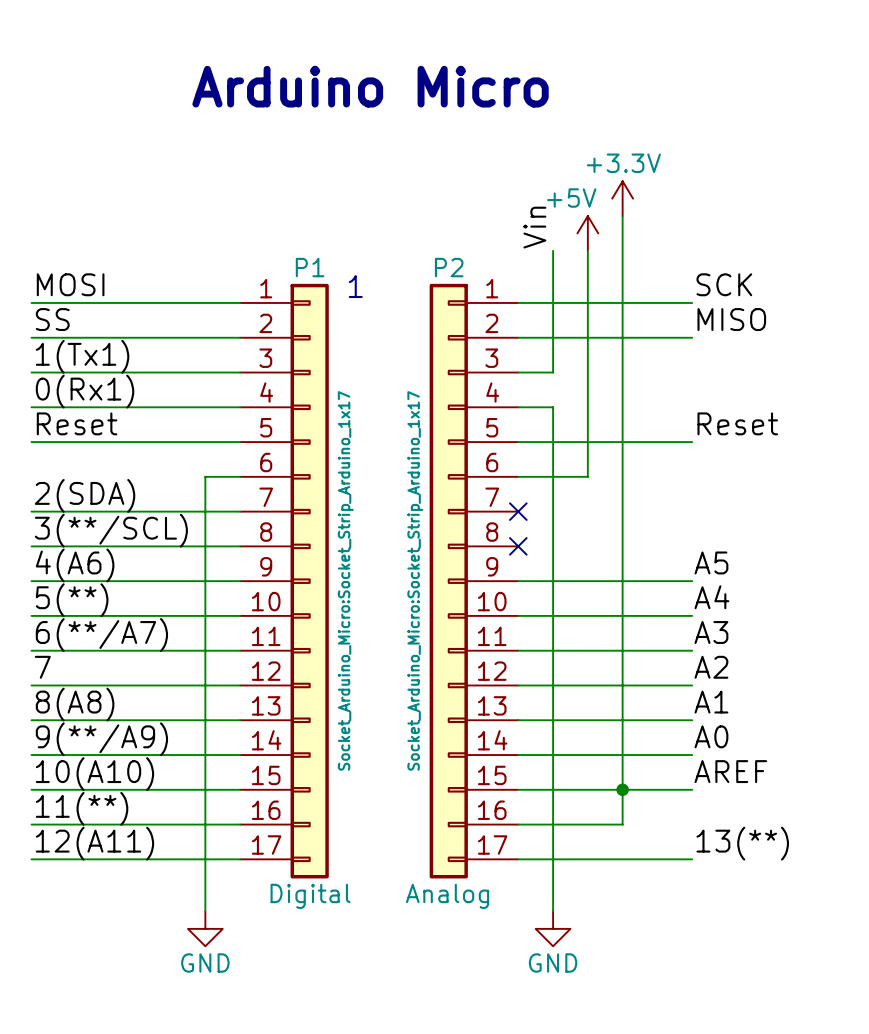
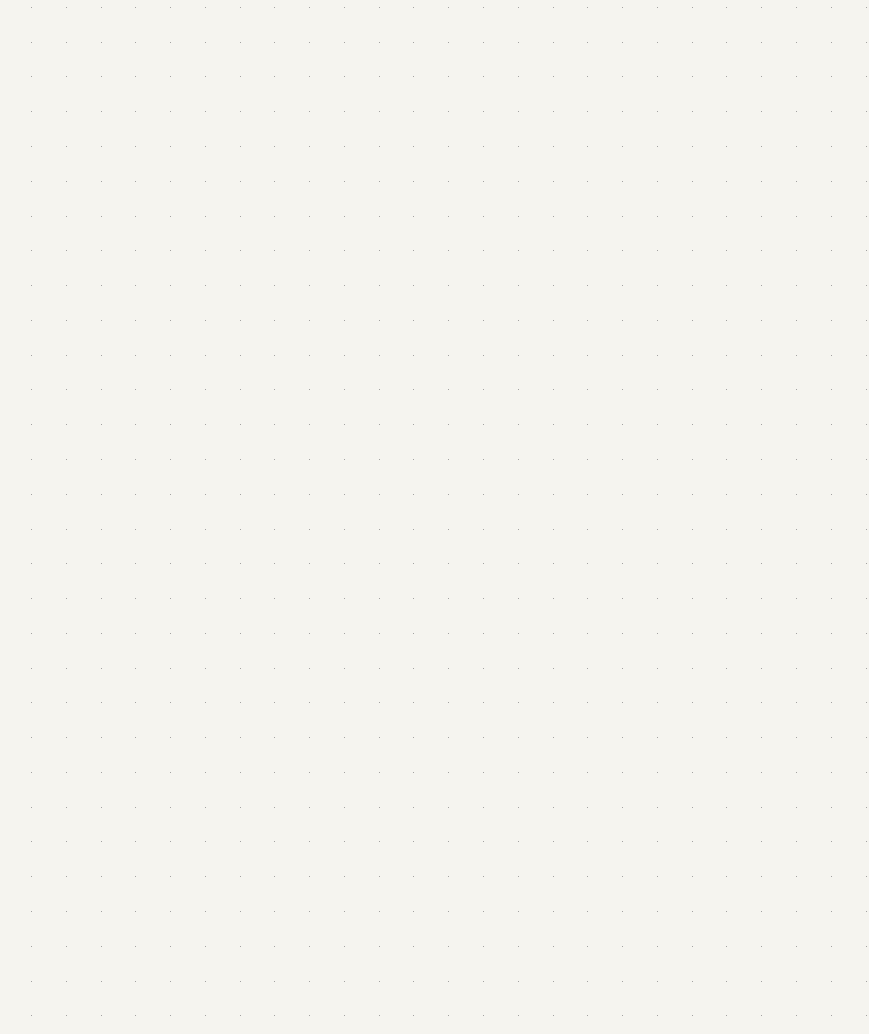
text: Arduino Micro (370, 86) -> none
power symbol: +3.3V (622, 198) -> none
wire: (622, 216) (622, 824) (518, 824) -> none
label: Vin (534, 227) -> none
power symbol: +5V (587, 233) -> none
wire: (553, 250) (553, 372) (518, 372) -> none
wire: (587, 250) (587, 476) (518, 476) -> none
label: MOSI (70, 284) -> none
label: SCK (724, 284) -> none
text: 1 (355, 286) -> none
wire: (31, 302) (240, 302) -> none
wire: (518, 302) (692, 302) -> none
label: SS (52, 319) -> none
label: MISO (731, 319) -> none
wire: (31, 337) (240, 337) -> none
wire: (518, 337) (692, 337) -> none
label: 1(Tx1) (82, 356) -> none
wire: (31, 372) (240, 372) -> none
label: 0(Rx1) (85, 391) -> none
wire: (31, 407) (240, 407) -> none
wire: (518, 407) (553, 407) (553, 911) -> none
label: Reset (77, 423) -> none
label: Reset (737, 423) -> none
wire: (31, 442) (240, 442) -> none
wire: (518, 442) (692, 442) -> none
wire: (240, 476) (205, 476) (205, 911) -> none
label: 2(SDA) (85, 495) -> none
wire: (31, 511) (240, 511) -> none
no-connect mark: (518, 511) -> none
label: 3(**/SCL) (111, 530) -> none
wire: (31, 546) (240, 546) -> none
no-connect mark: (518, 546) -> none
label: A5 (711, 562) -> none
label: 4(A6) (75, 565) -> none
wire: (31, 581) (240, 581) -> none
P1: Digital (284, 581) -> none
P2: Analog (473, 581) -> none
wire: (518, 581) (692, 581) -> none
label: A4 (711, 597) -> none
label: 5(**) (72, 600) -> none
wire: (31, 615) (240, 615) -> none
wire: (518, 615) (692, 615) -> none
label: A3 (711, 632) -> none
label: 6(**/A7) (101, 634) -> none
wire: (31, 650) (240, 650) -> none
wire: (518, 650) (692, 650) -> none
label: 7 (42, 667) -> none
label: A2 (711, 667) -> none
wire: (31, 685) (240, 685) -> none
wire: (518, 685) (692, 685) -> none
label: A1 (711, 702) -> none
label: 8(A8) (75, 704) -> none
wire: (31, 720) (240, 720) -> none
wire: (518, 720) (692, 720) -> none
label: A0 (711, 736) -> none
label: 9(**/A9) (101, 739) -> none
wire: (31, 755) (240, 755) -> none
wire: (518, 755) (692, 755) -> none
label: AREF (730, 771) -> none
label: 10(A10) (94, 774) -> none
wire: (31, 789) (240, 789) -> none
wire: (518, 789) (692, 789) -> none
junction: (622, 789) -> none
label: 11(**) (82, 808) -> none
wire: (31, 824) (240, 824) -> none
label: 12(A11) (94, 843) -> none
label: 13(**) (742, 843) -> none
wire: (31, 859) (240, 859) -> none
wire: (518, 859) (692, 859) -> none
power symbol: GND (205, 928) -> none
power symbol: GND (553, 928) -> none

